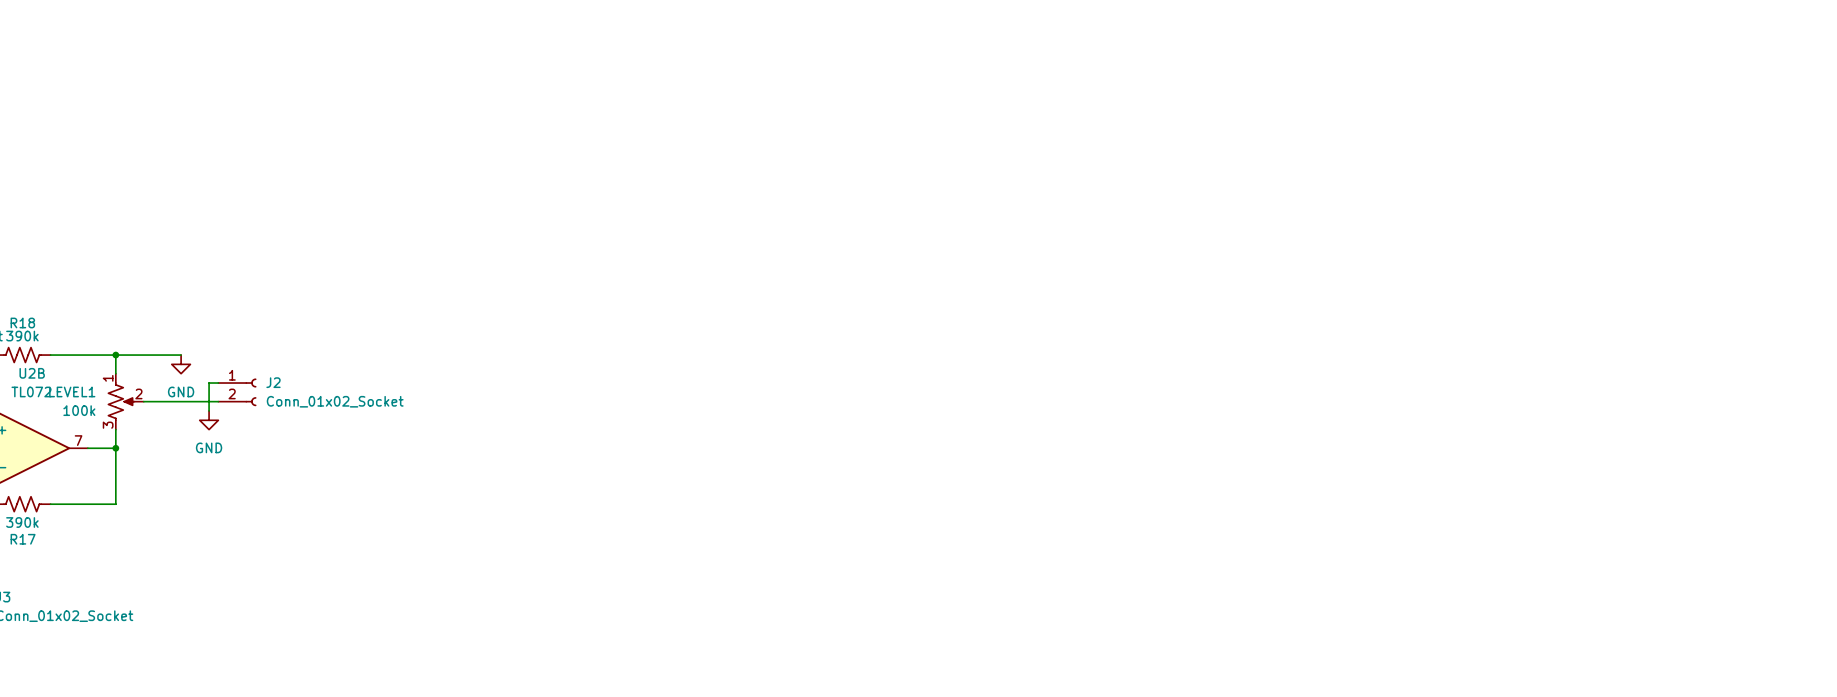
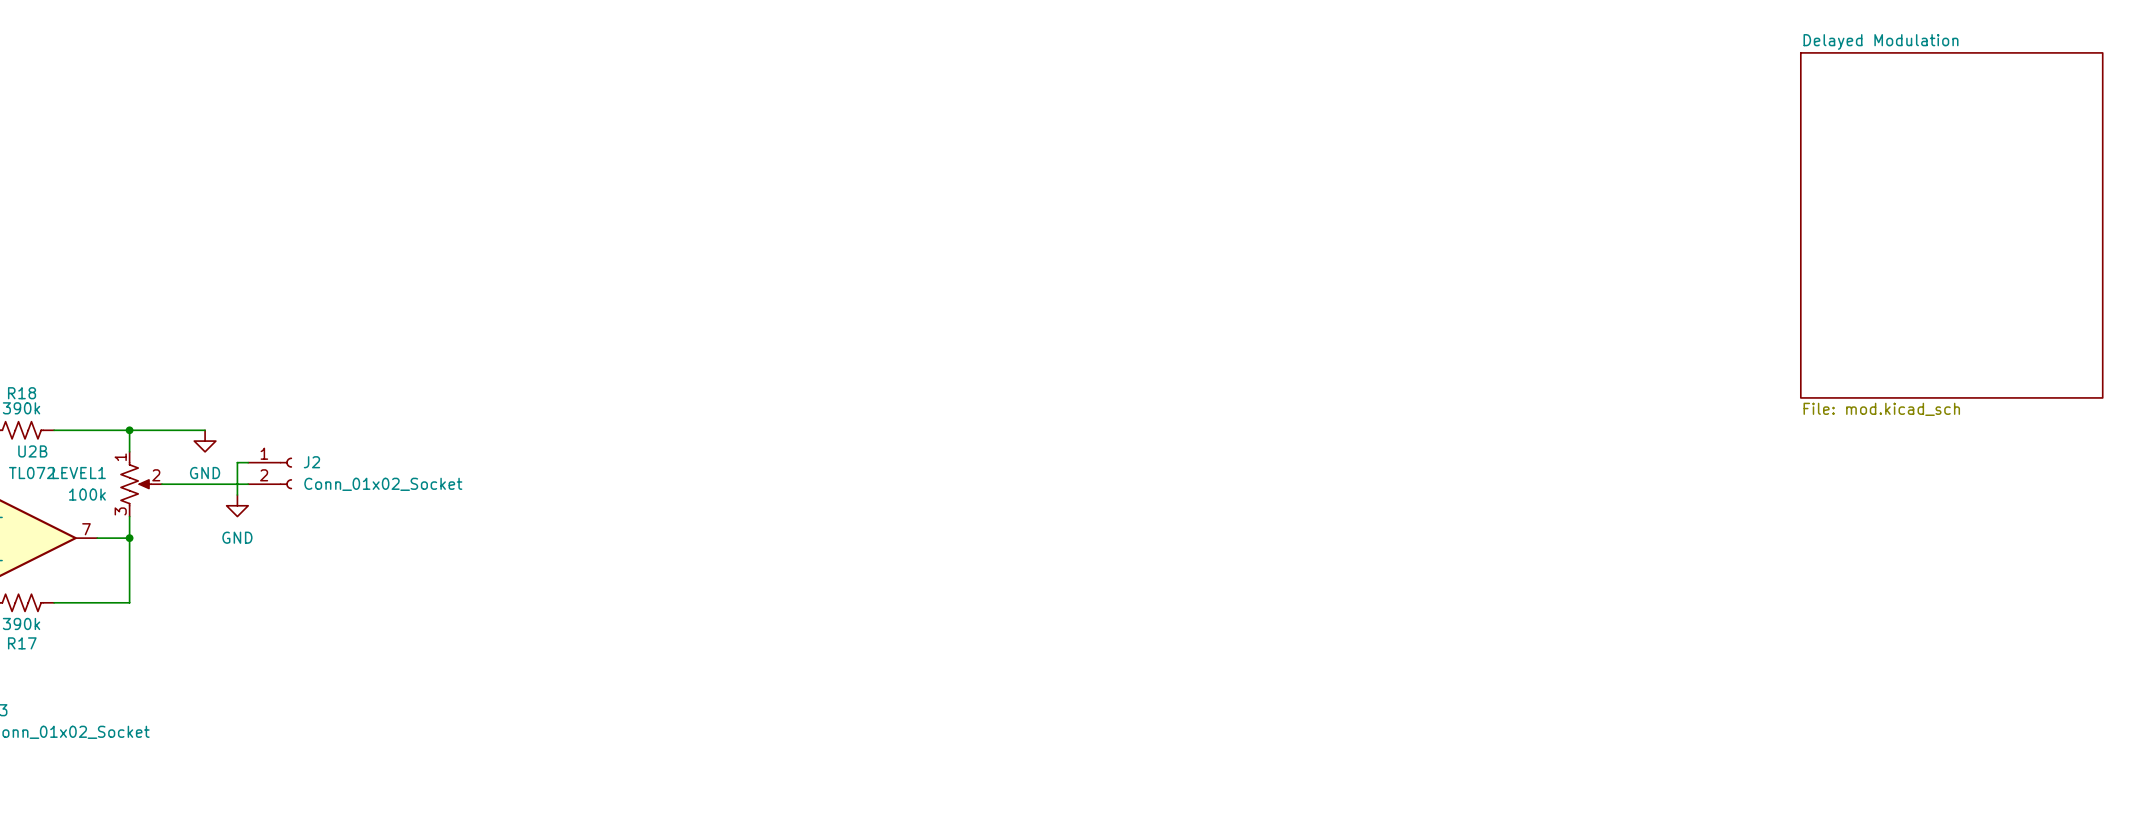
sheet Delayed Modulation: none -> File: mod.kicad_sch (1951, 225)

